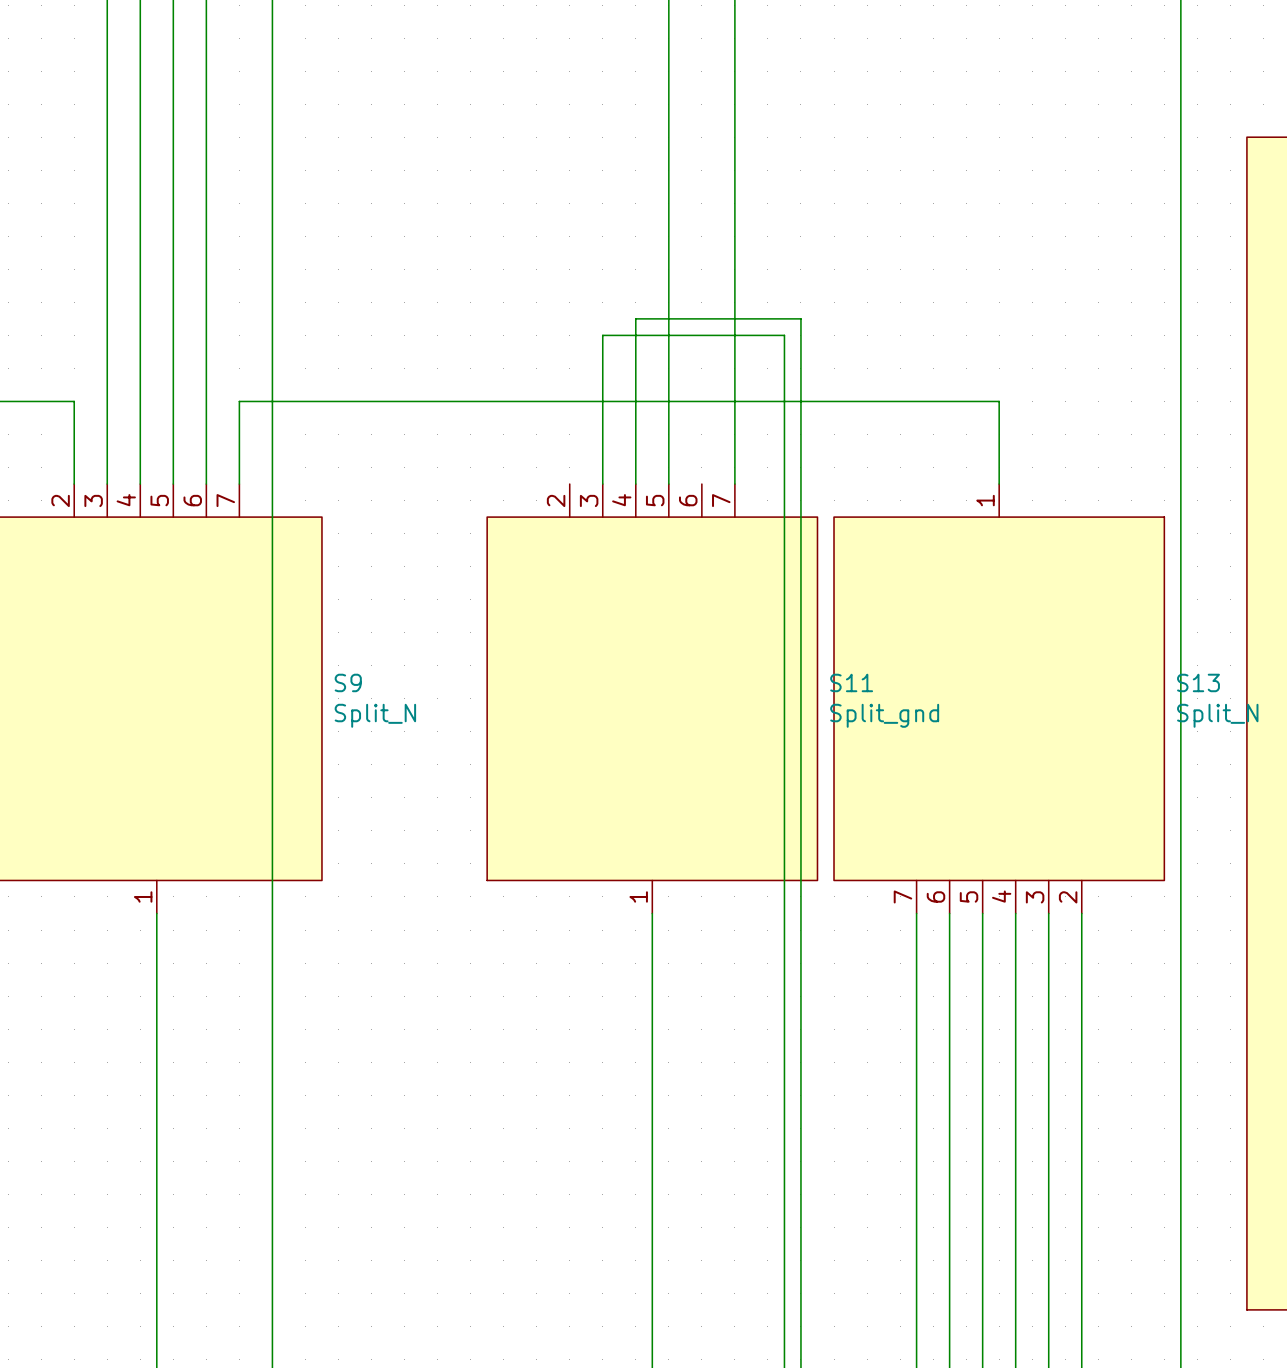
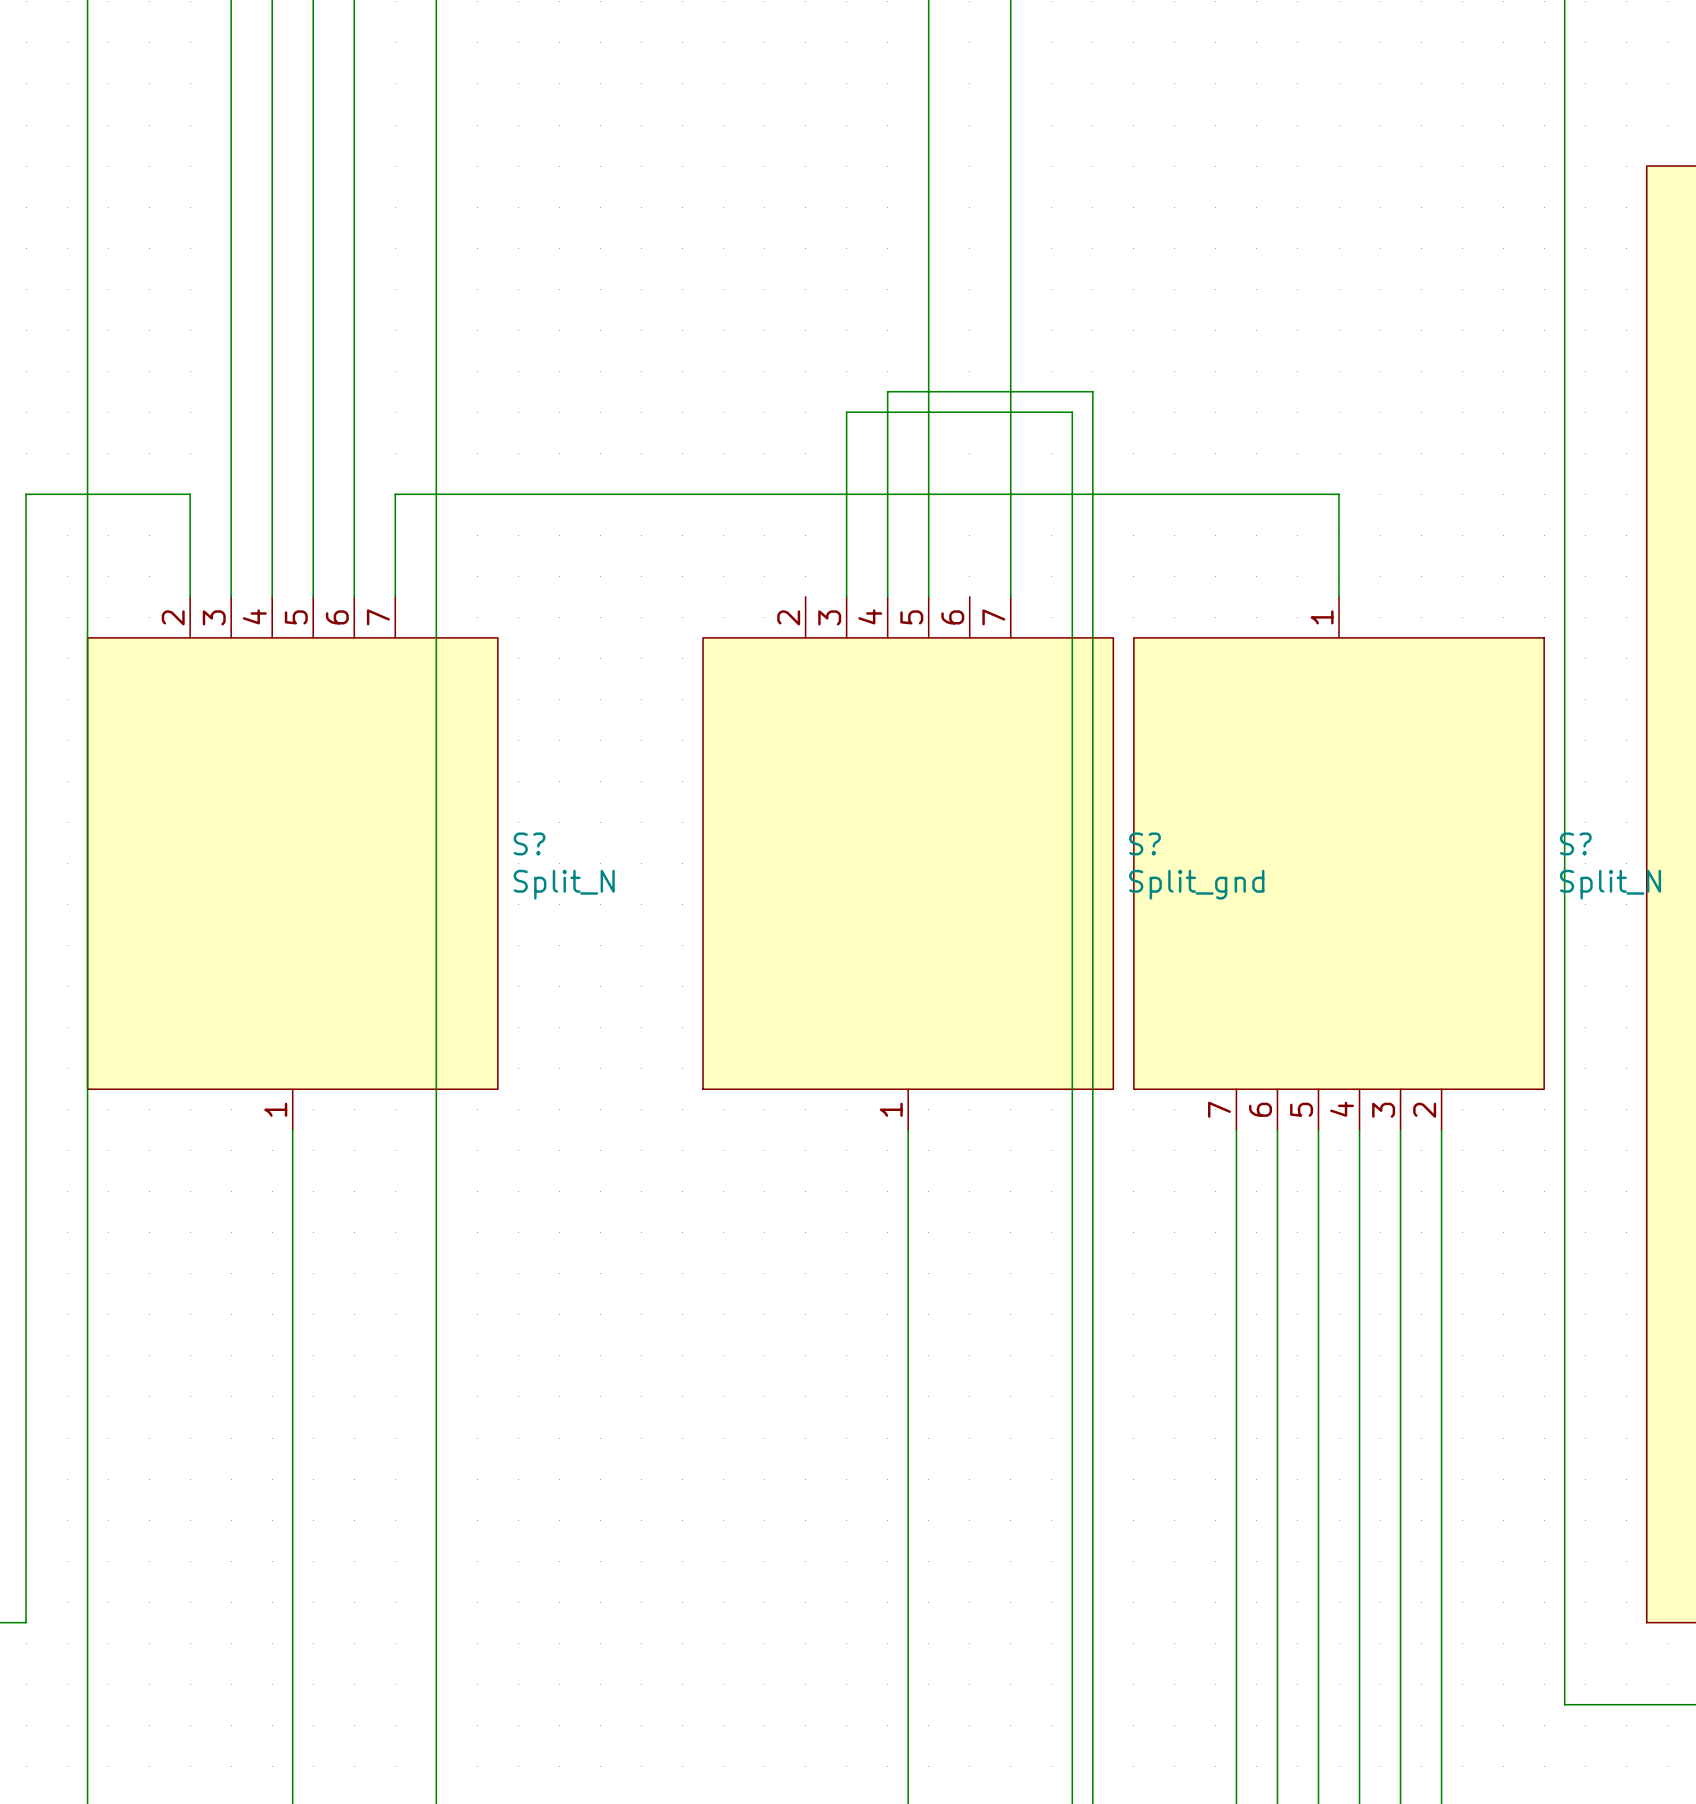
S9 name: S9 (348, 682) -> S? (529, 843)
S11 name: S11 (851, 682) -> S? (1145, 843)
S13 name: S13 (1198, 682) -> S? (1575, 843)

